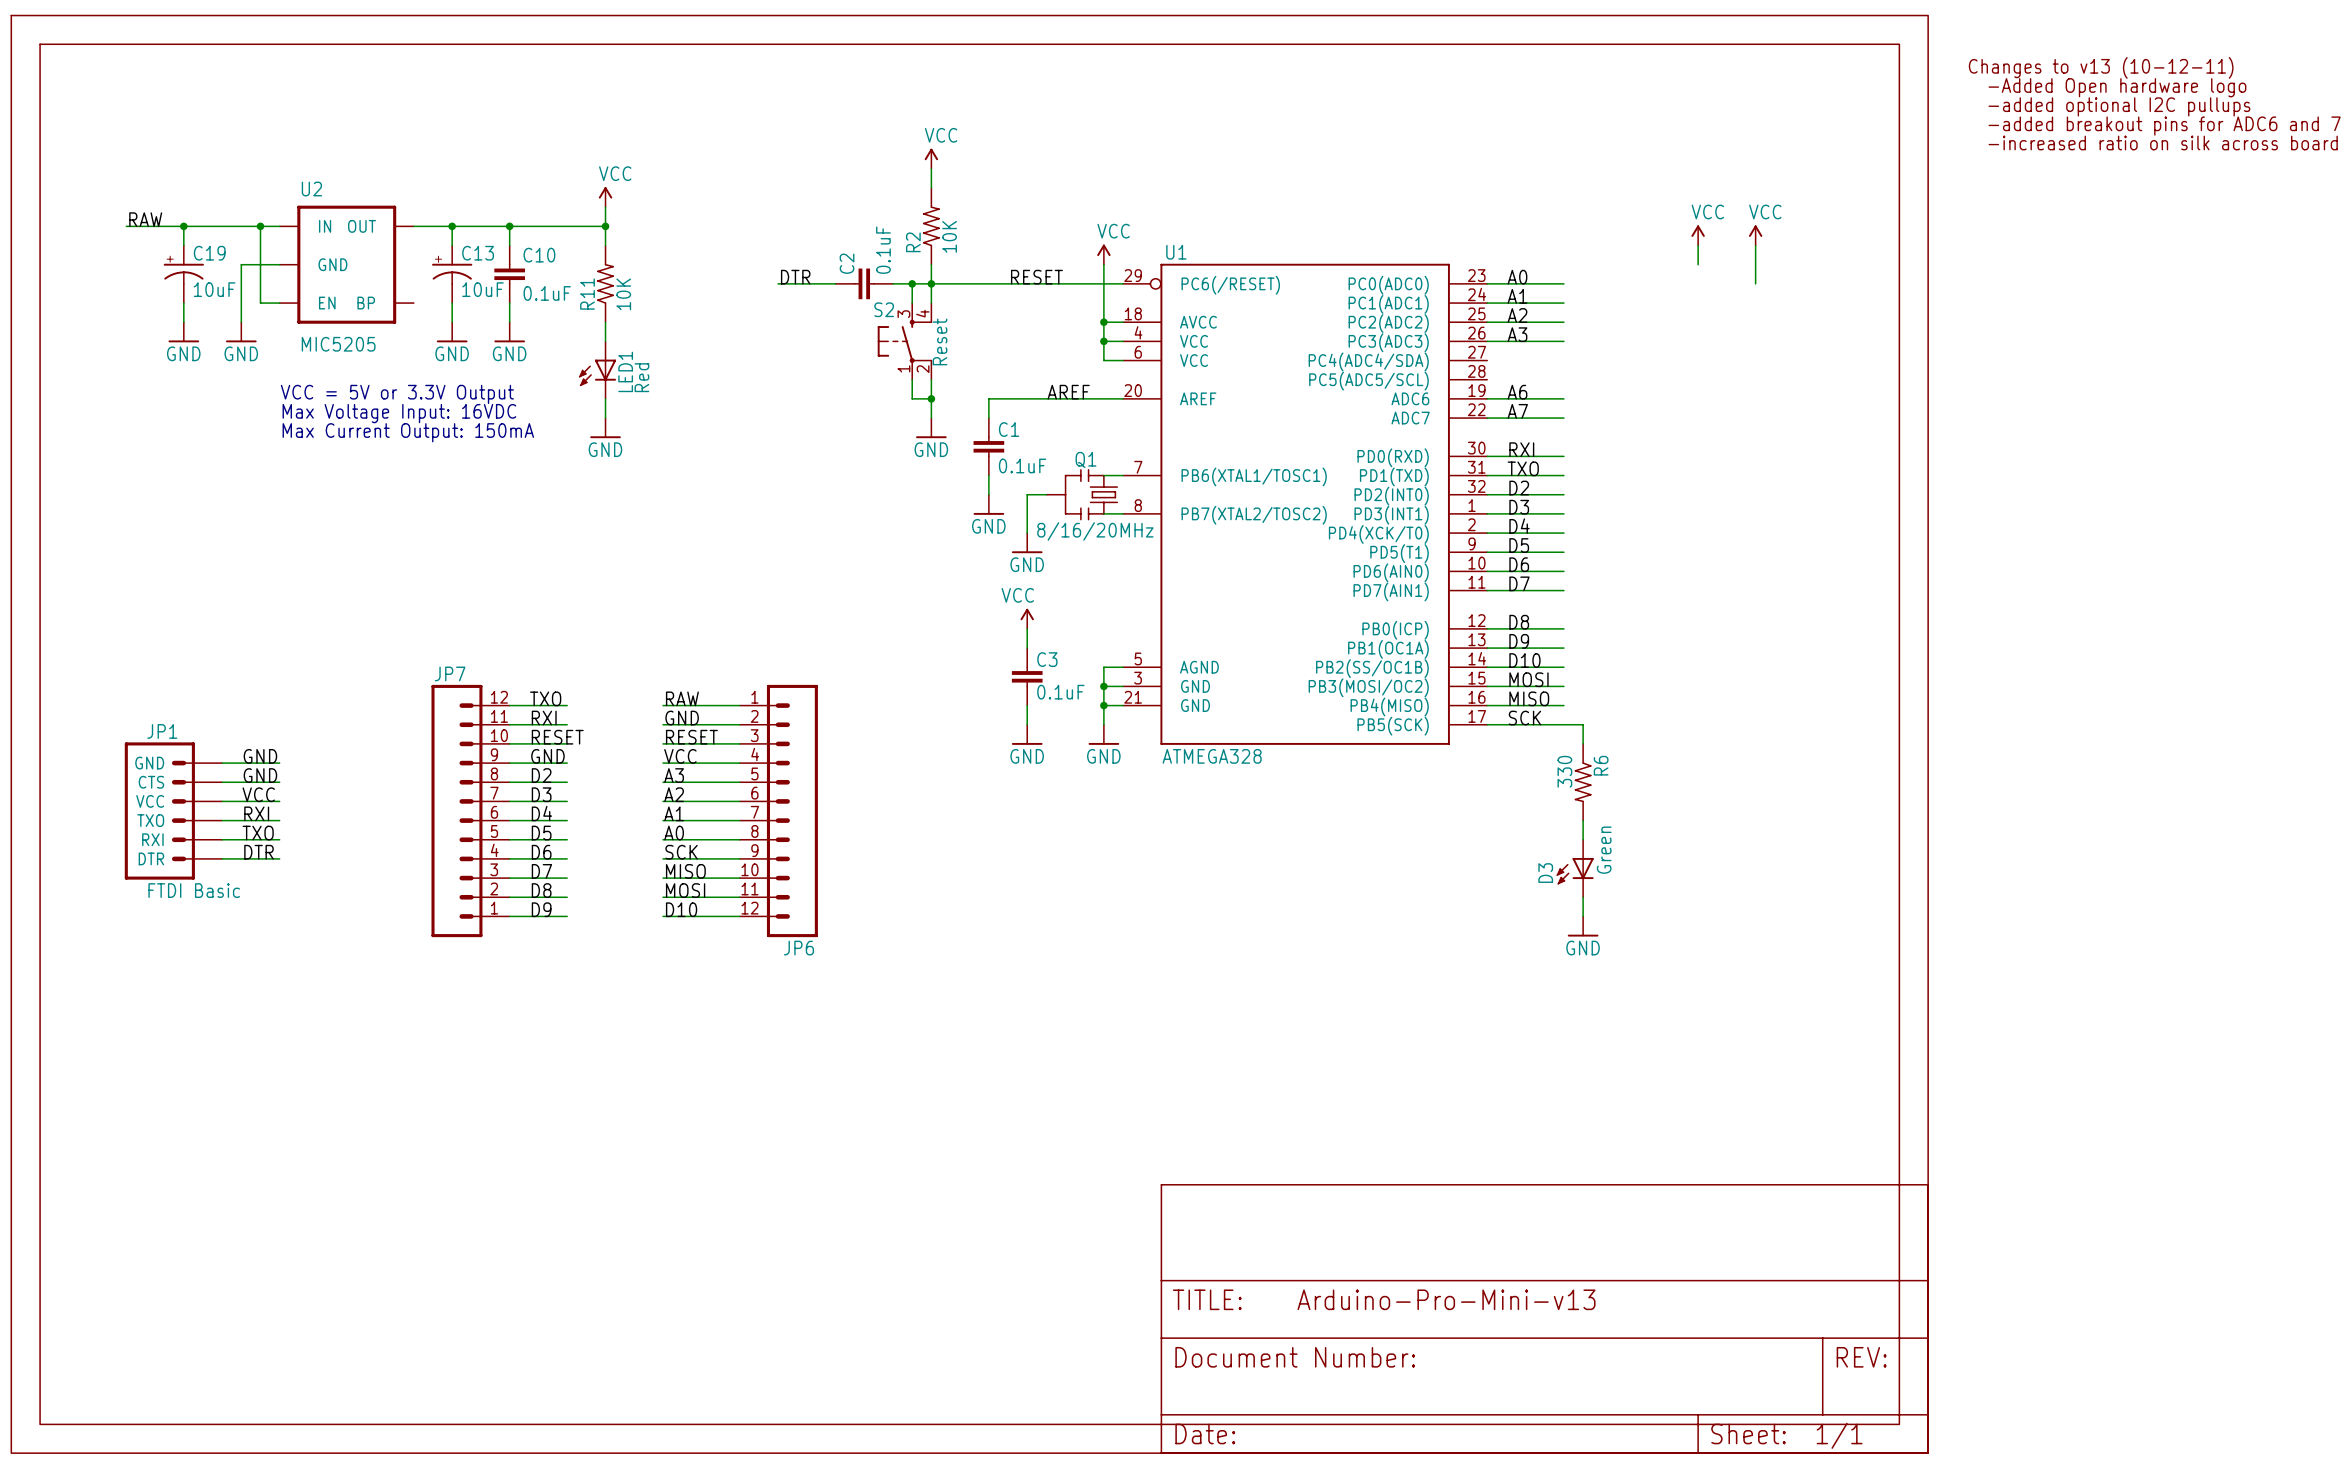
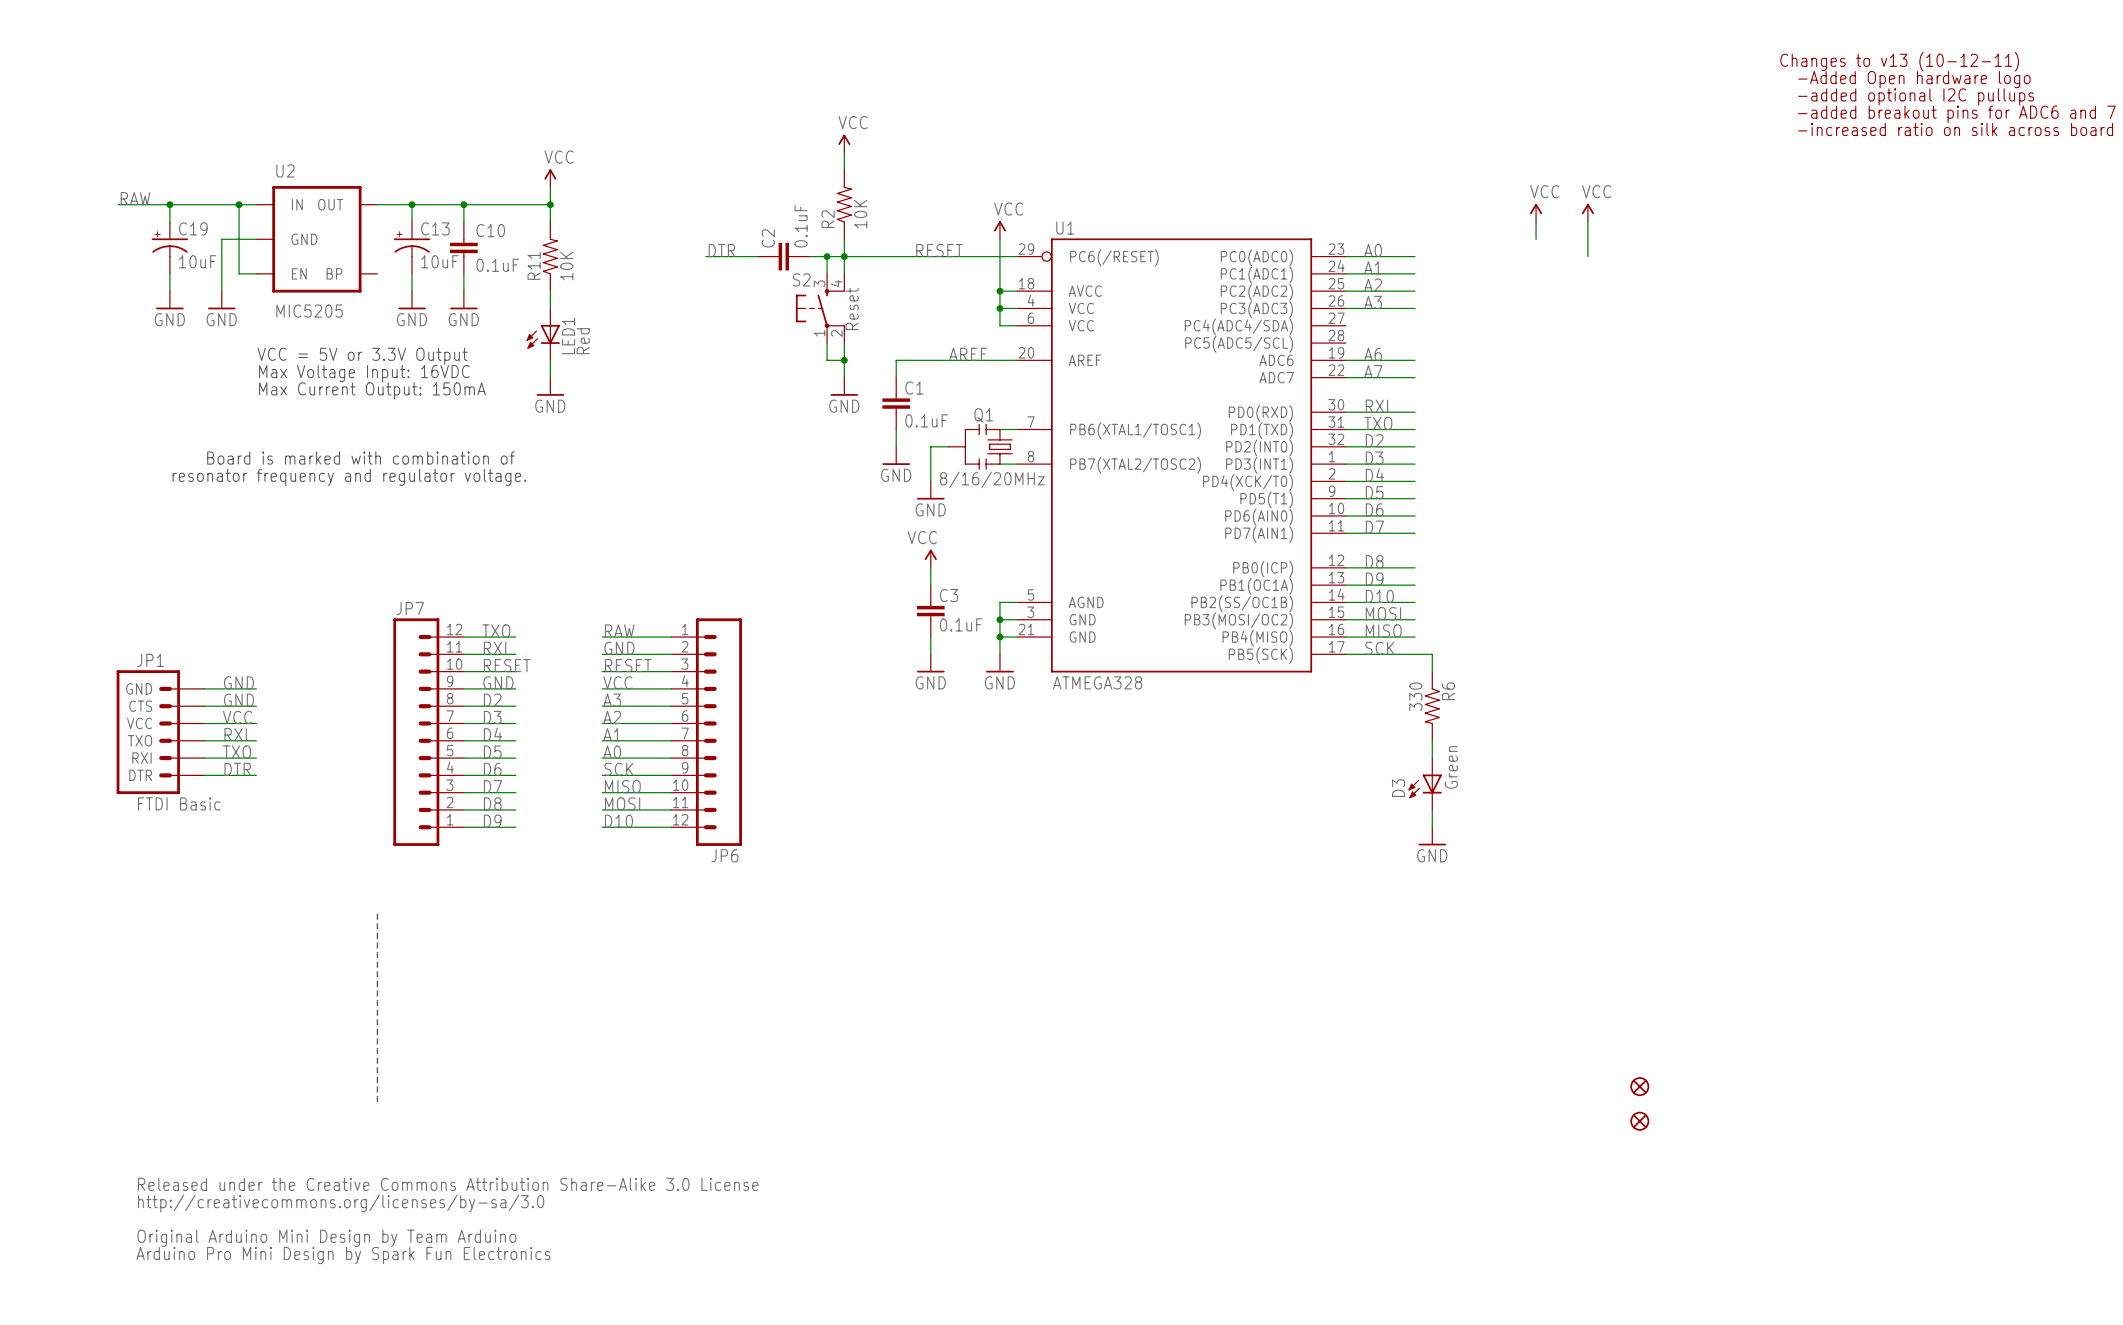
text: none -> Board is marked with combination of (361, 458)
text: none -> resonator frequency and regulator voltage. (349, 477)
part: (969, 734) -> none
line: none -> (377, 913) (377, 1103)
part: none -> (1639, 1086)
part: none -> (1639, 1121)
text: none -> Released under the Creative Commons Attribution Share-Alike 3.0 License (448, 1184)
part: (1544, 1318) -> none
text: none -> http://creativecommons.org/licenses/by-sa/3.0 (341, 1203)
text: none -> Original Arduino Mini Design by Team Arduino (326, 1238)
text: none -> Arduino Pro Mini Design by Spark Fun Electronics (343, 1255)

